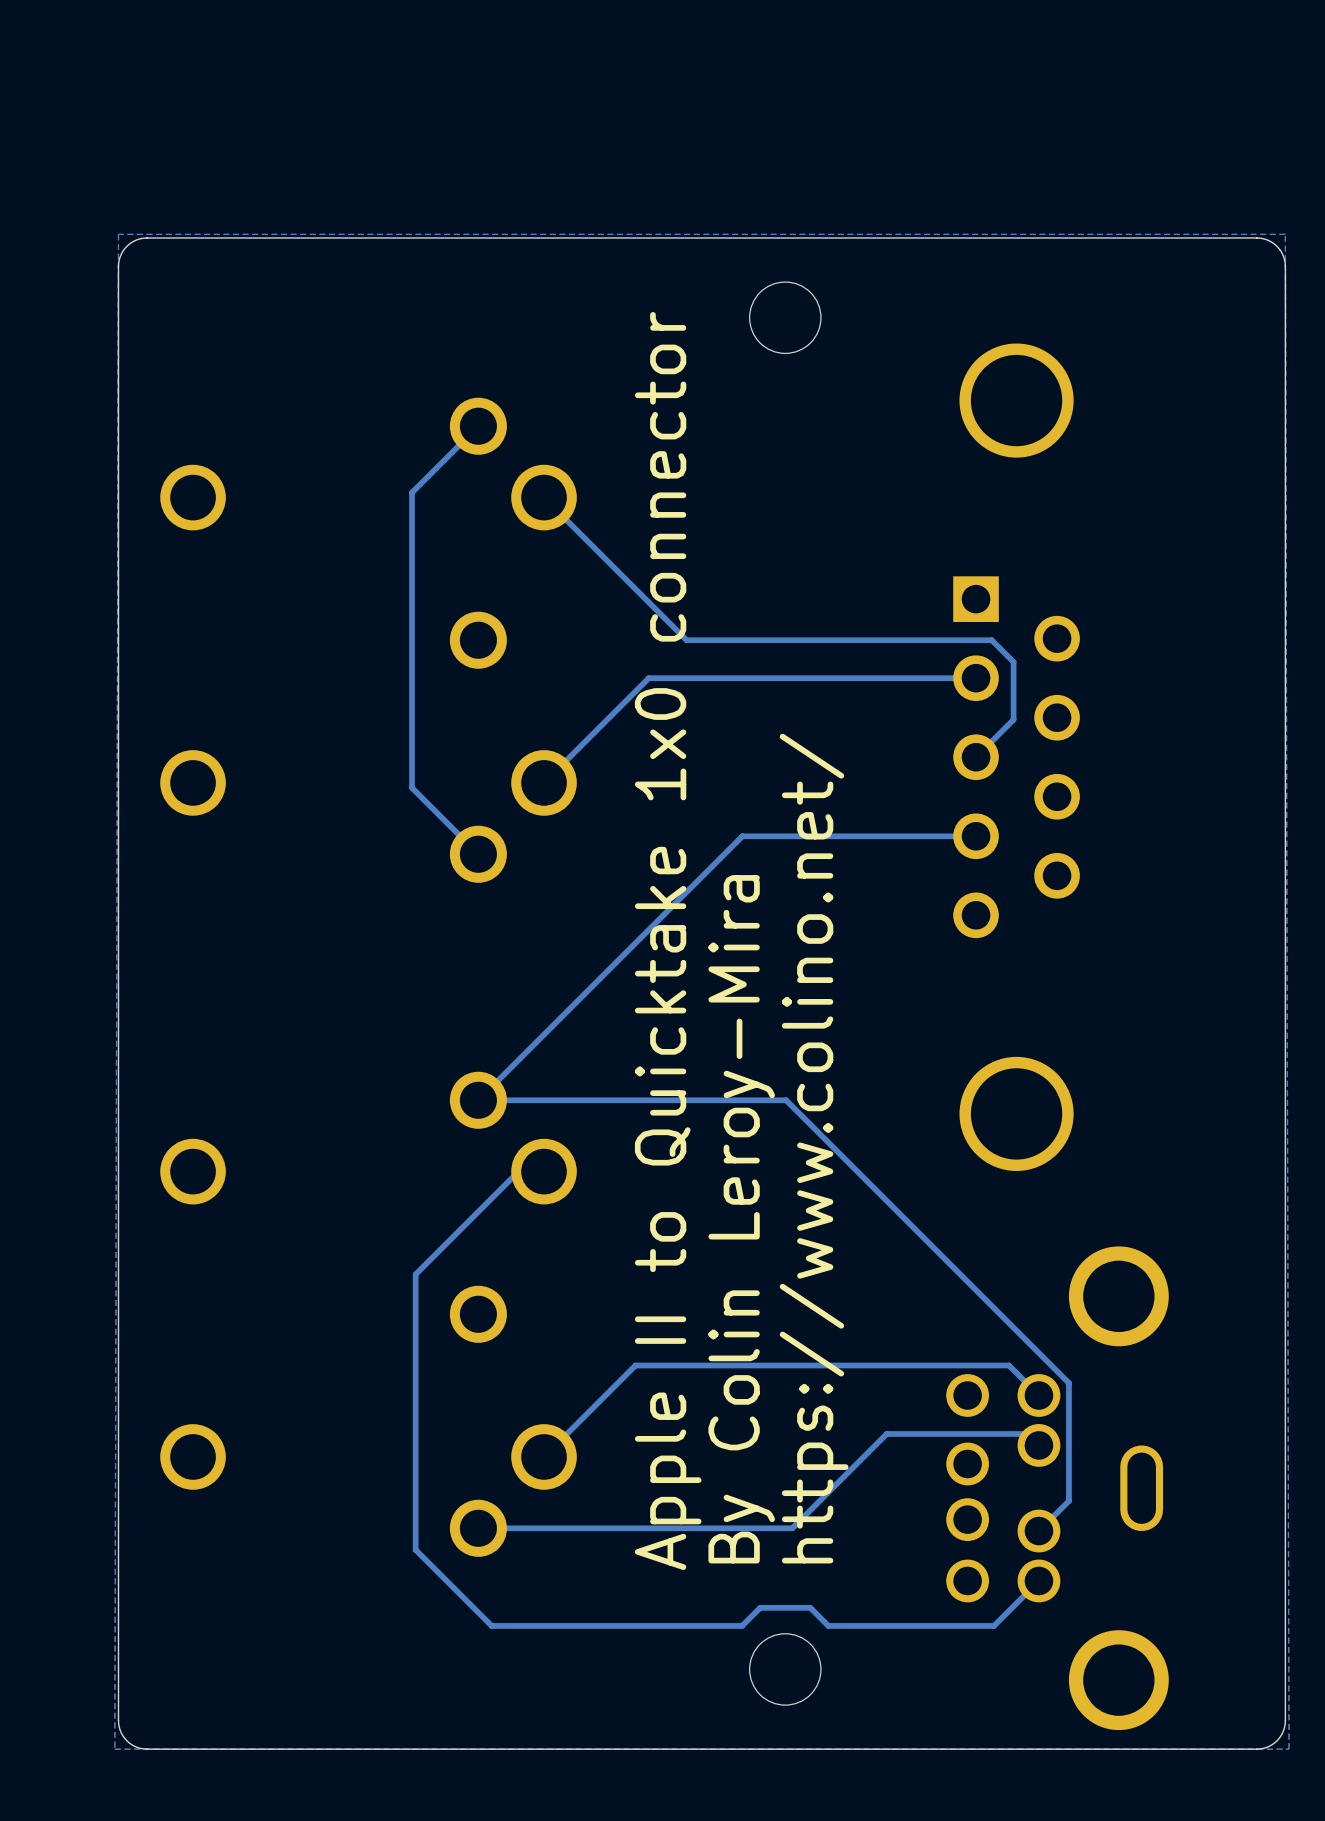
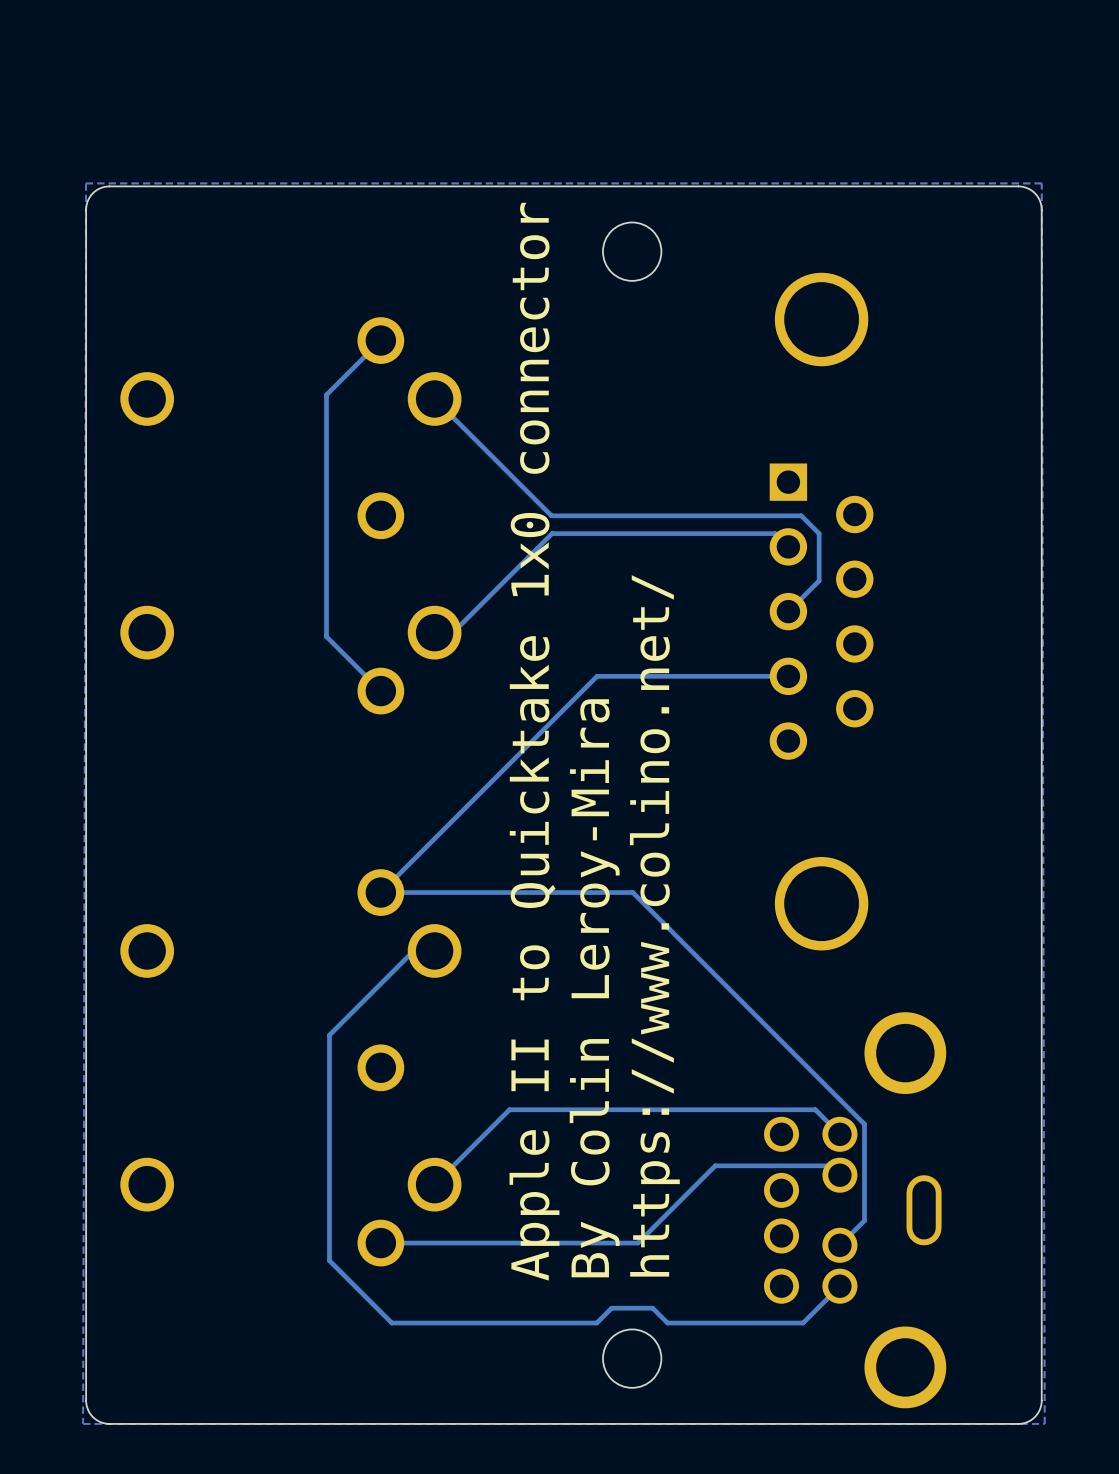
bottom track: (976, 678) (648, 678) (544, 782) -> (788, 546) (775, 533) (552, 533) (453, 632) (434, 632)

